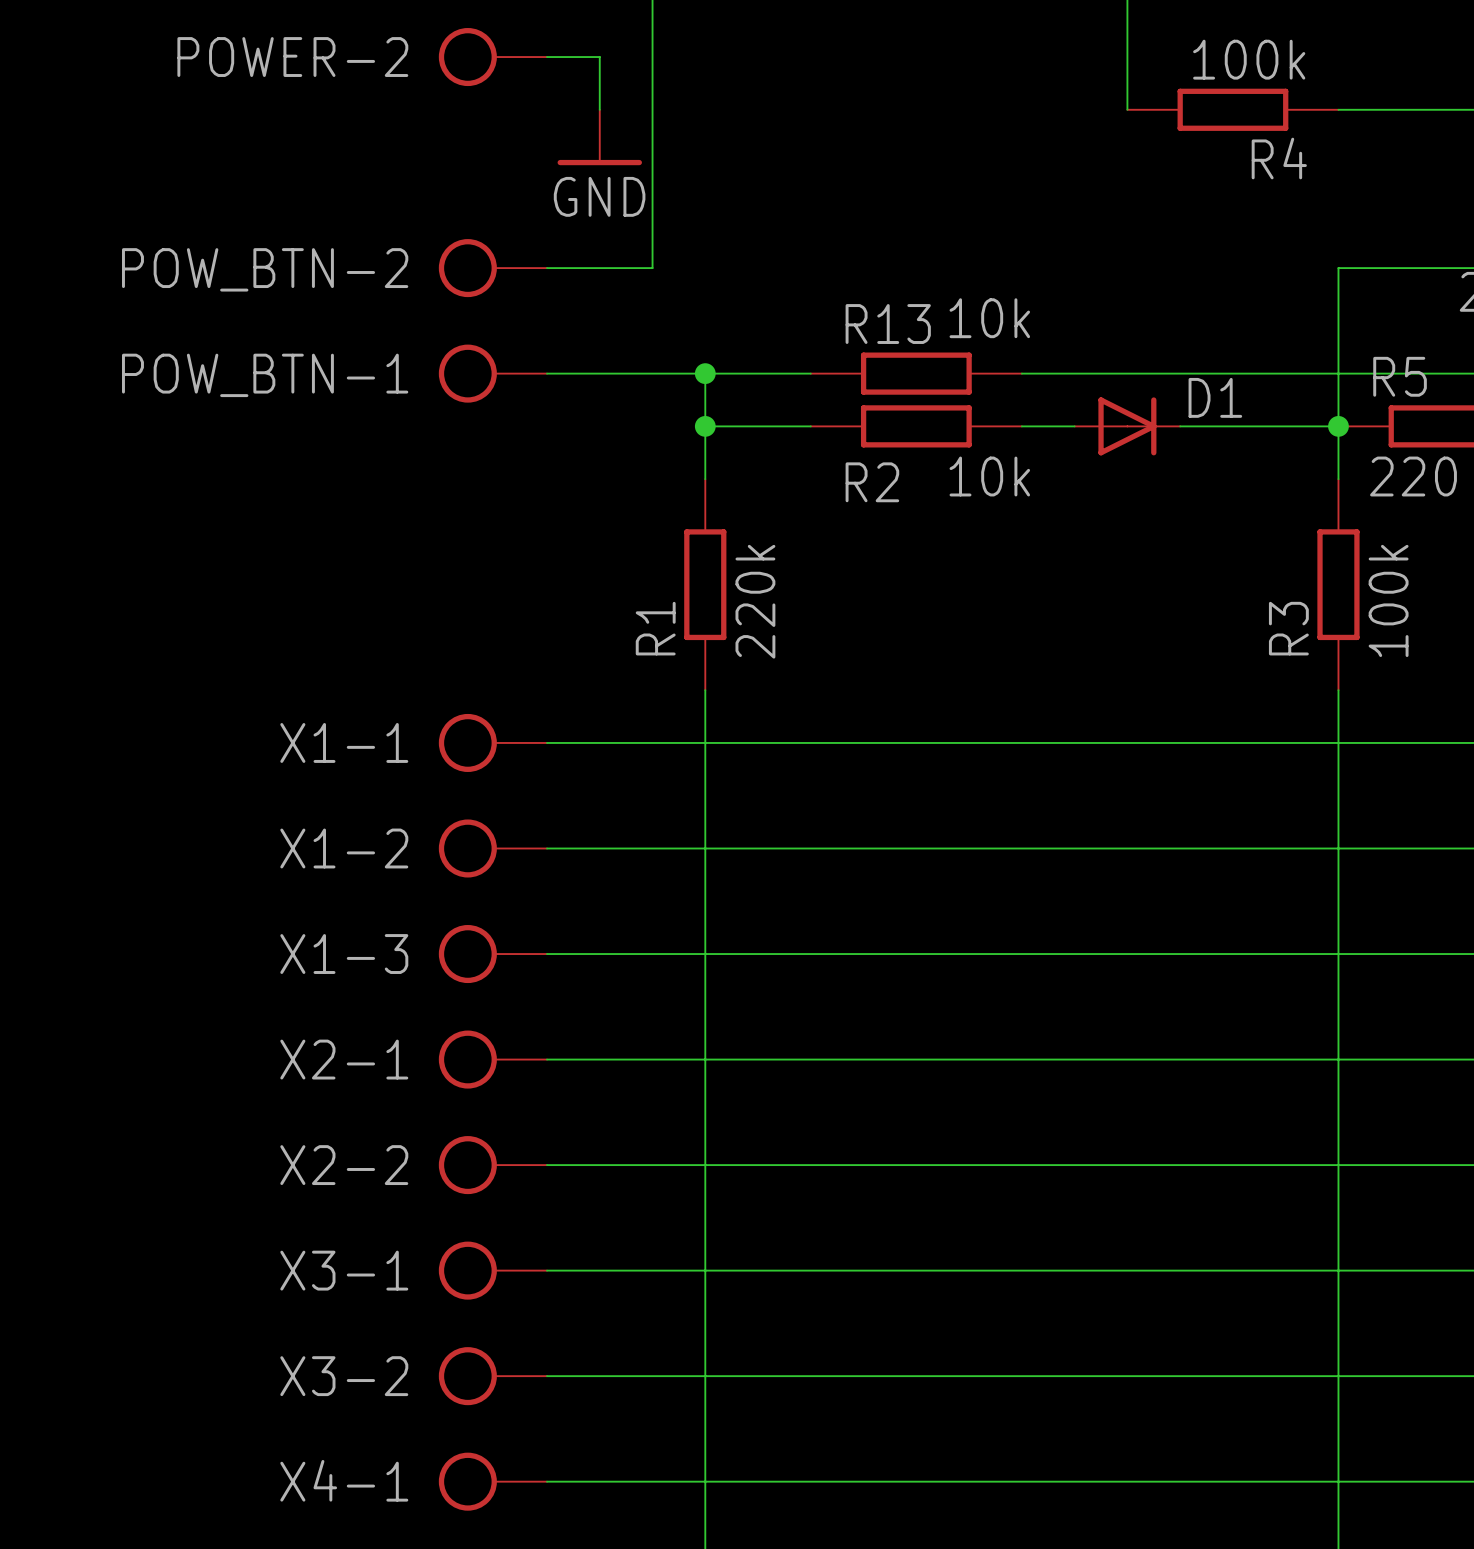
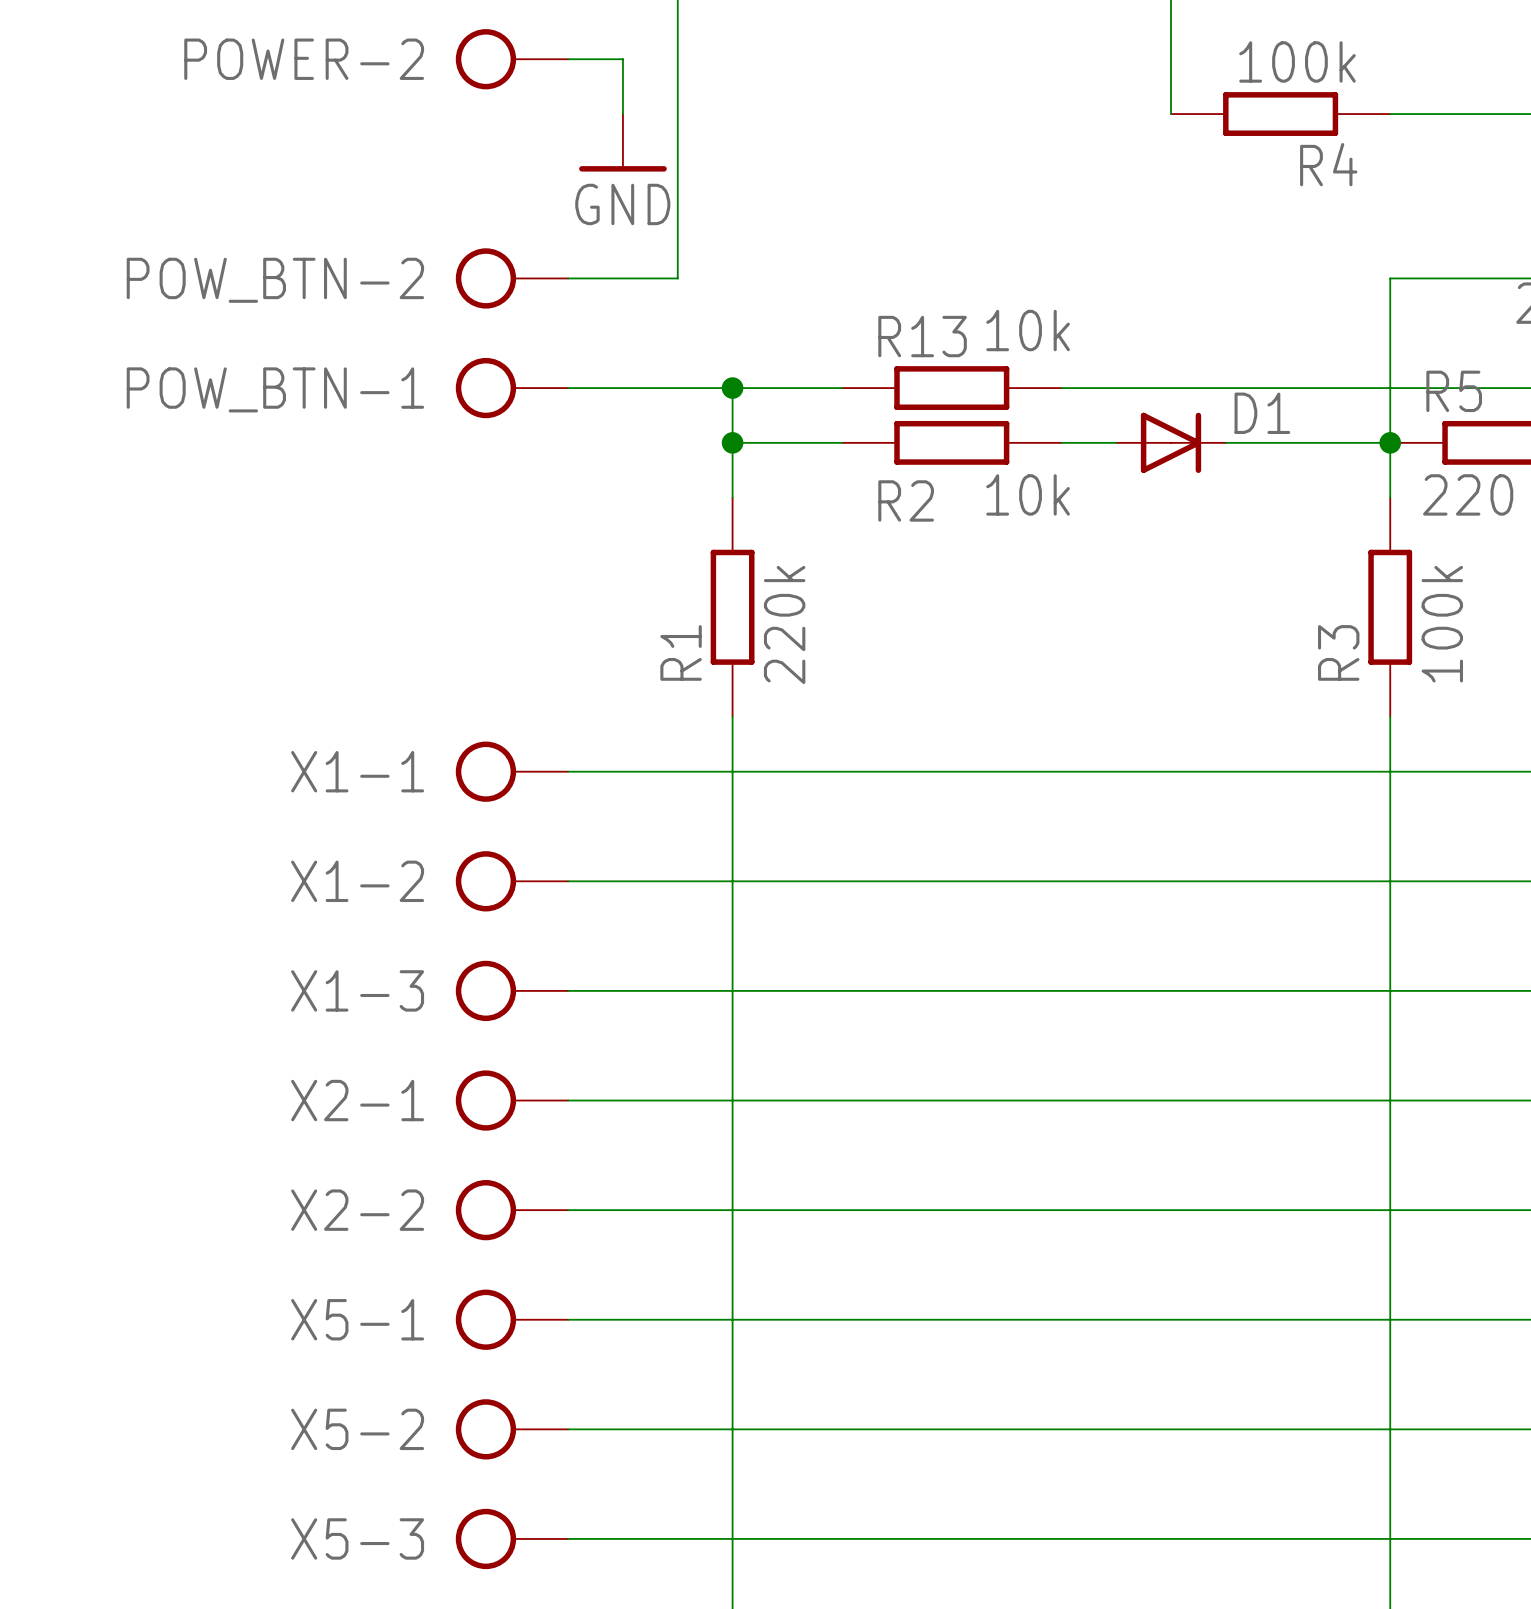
X3-1 name: X3-1 (344, 1270) -> X5-1 (357, 1319)
X3-2 name: X3-2 (344, 1376) -> X5-2 (357, 1429)
X4-1 name: X4-1 (344, 1480) -> X5-3 (357, 1538)

